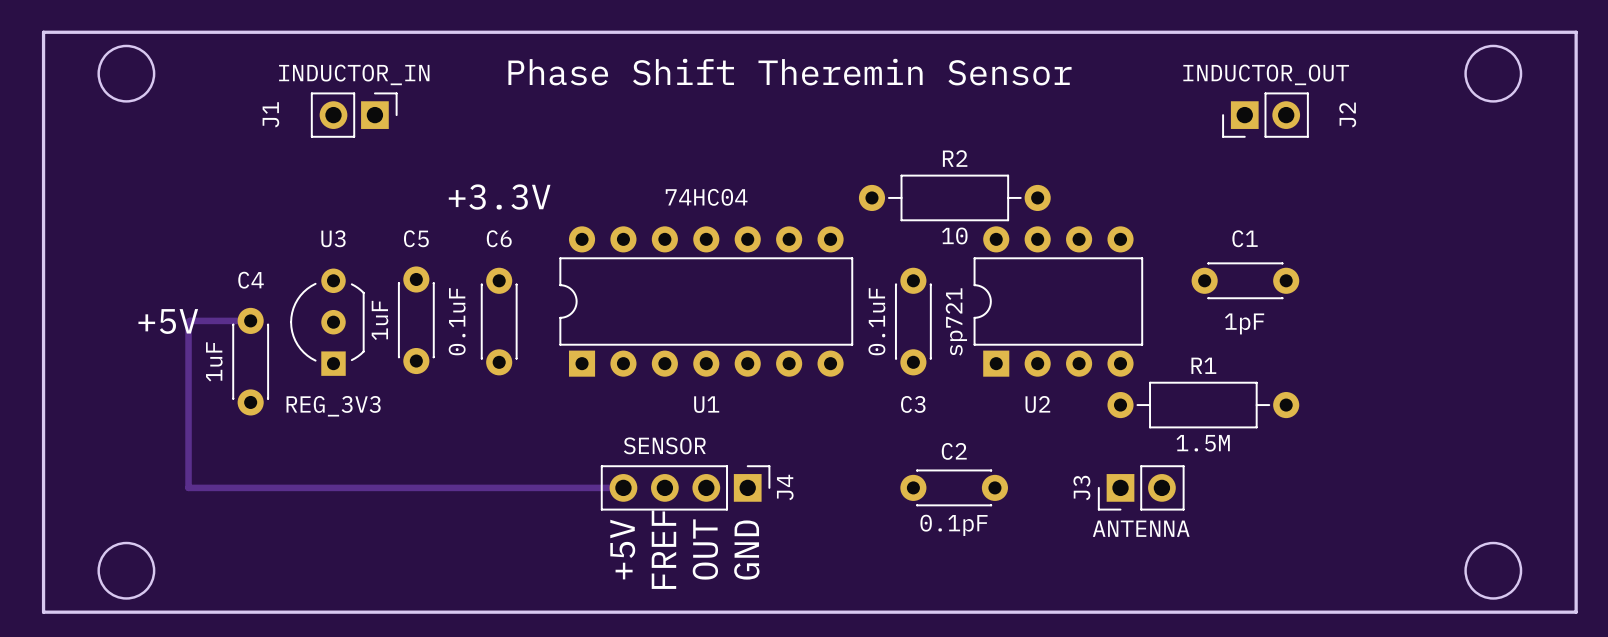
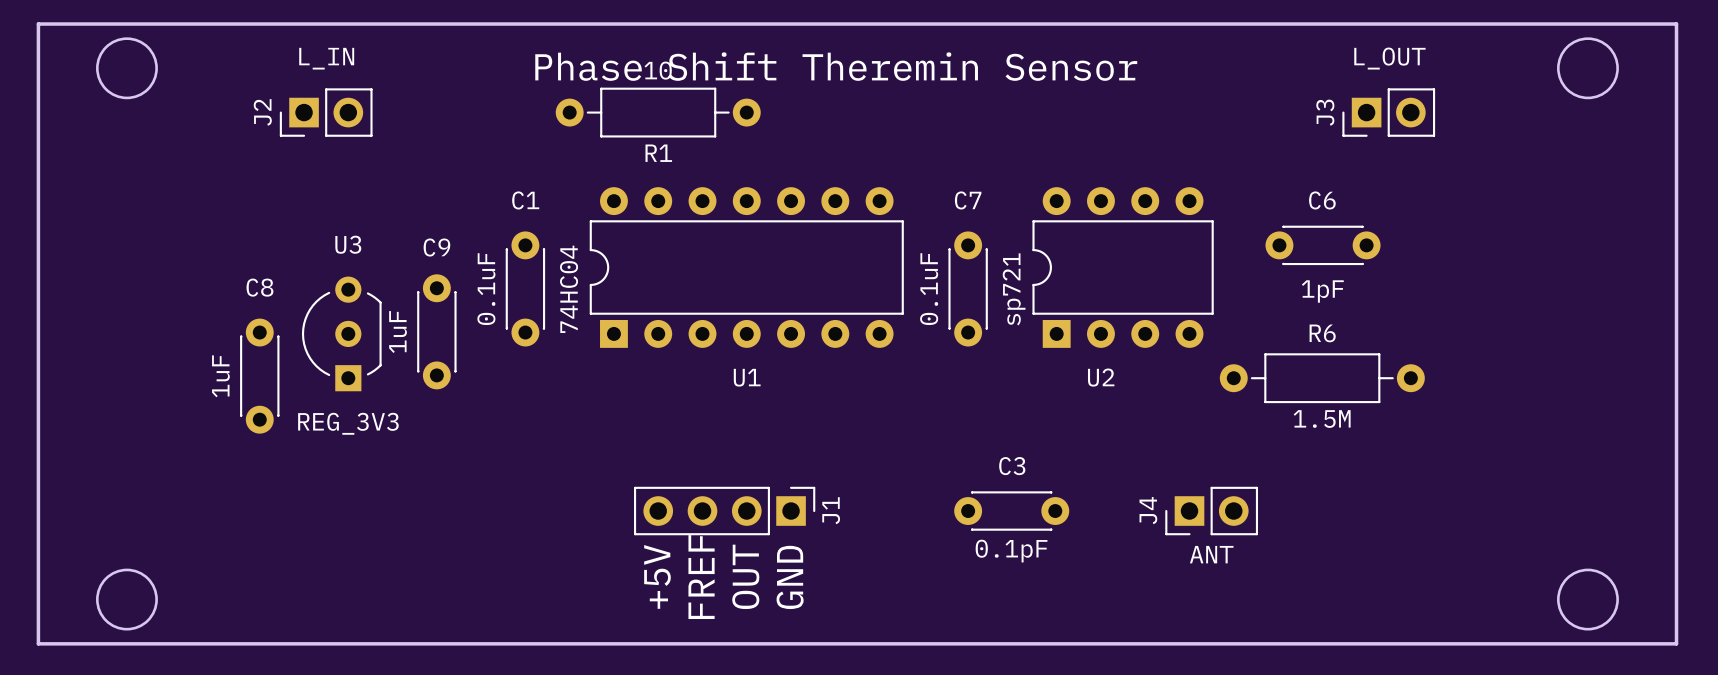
J2 value: INDUCTOR_OUT (1266, 74) -> L_IN (326, 58)
J2 name position: J2 (1347, 114) -> J2 (262, 112)
J1: INDUCTOR_IN (354, 115) -> none
J2 position: (1265, 115) -> (326, 112)
J3: none -> L_OUT (1388, 112)
text: +3.3V (499, 197) -> none
U1 value rotation: 0° (706, 197) -> 90° counterclockwise (569, 289)
U1 value position: 74HC04 (706, 197) -> 74HC04 (569, 289)
R2: 10 (954, 197) -> none
C5 name: C5 (416, 238) -> C9 (436, 247)
C6 name position: C6 (499, 238) -> C6 (1322, 200)
C1 name position: C1 (1245, 238) -> C1 (525, 200)
C4 name: C4 (251, 280) -> C8 (259, 287)
C7: none -> 0.1uF (968, 288)
C1 rotation: 0° (1245, 280) -> 90° clockwise (525, 288)
C1 position: (1245, 280) -> (525, 288)
U1 position: (706, 301) -> (746, 267)
U2 position: (1058, 301) -> (1123, 267)
track: (250, 320) (188, 322) (188, 487) (623, 487) -> none
text: +5V (168, 321) -> none
C6 value: 0.1uF (457, 321) -> 1pF (1322, 291)
C6 rotation: 0° (499, 321) -> 90° clockwise (1323, 245)
C6 position: (499, 321) -> (1323, 245)
C3: 0.1uF (913, 321) -> none
C1 value: 1pF (1244, 323) -> 0.1uF (486, 289)
R6: none -> 1.5M (1322, 378)
R1 name position: R1 (1203, 365) -> R1 (658, 153)
R1 position: (1203, 405) -> (658, 112)
R1 value: 1.5M (1203, 443) -> 10 (658, 70)
J4 value: SENSOR (664, 445) -> none
C2 name: C2 (954, 451) -> C3 (1012, 466)
J4 name: J4 (785, 487) -> J1 (831, 510)
J3 name: J3 (1081, 487) -> J4 (1148, 510)
J3 value: ANTENNA (1141, 528) -> ANT (1211, 554)

